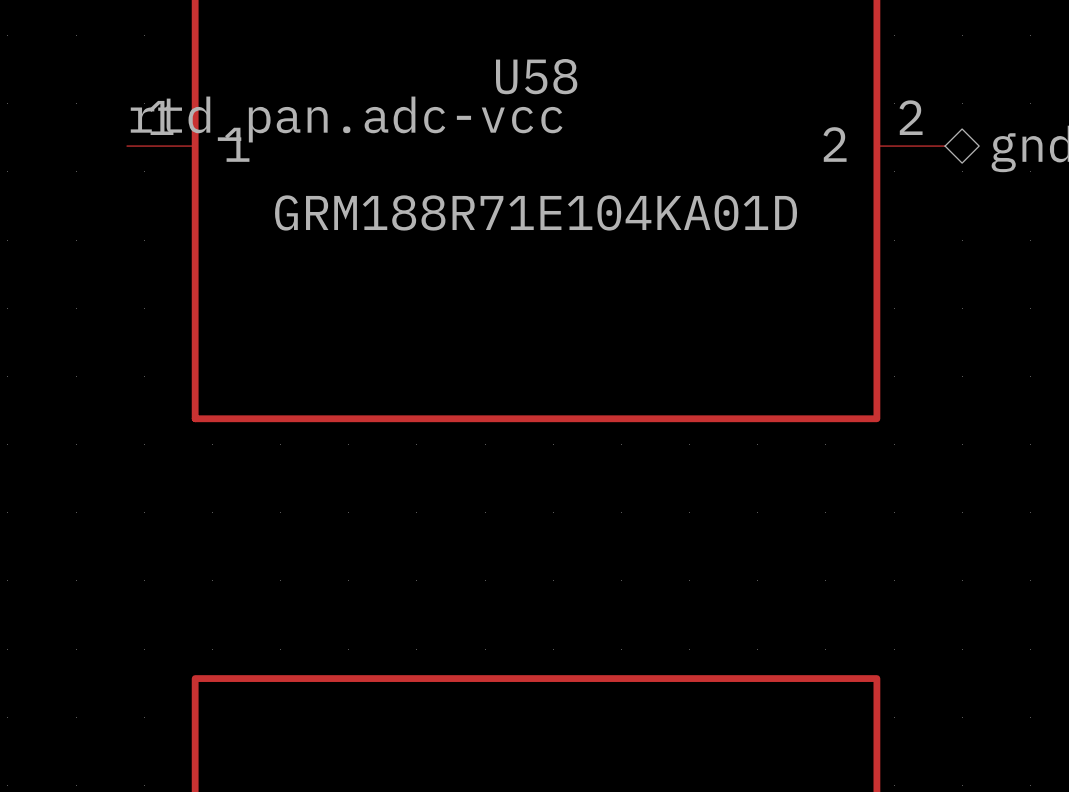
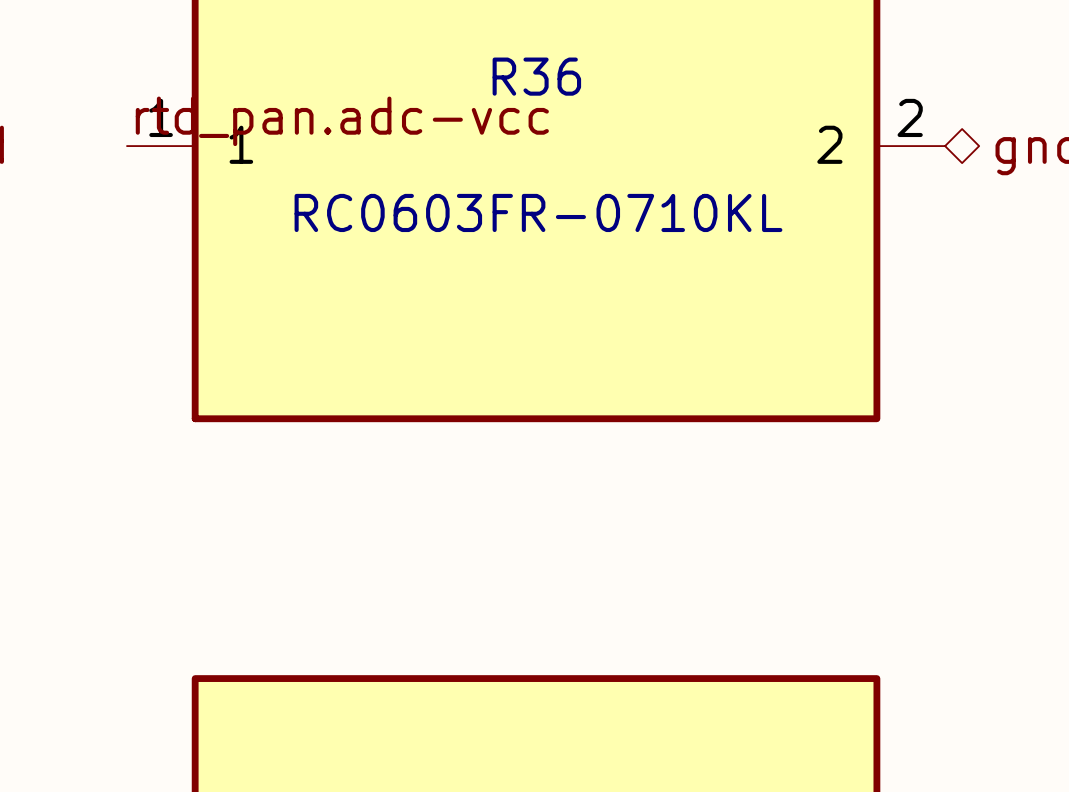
U58 name: U58 (536, 76) -> R36 (536, 76)
U58 value: GRM188R71E104KA01D (536, 212) -> RC0603FR-0710KL (538, 212)

